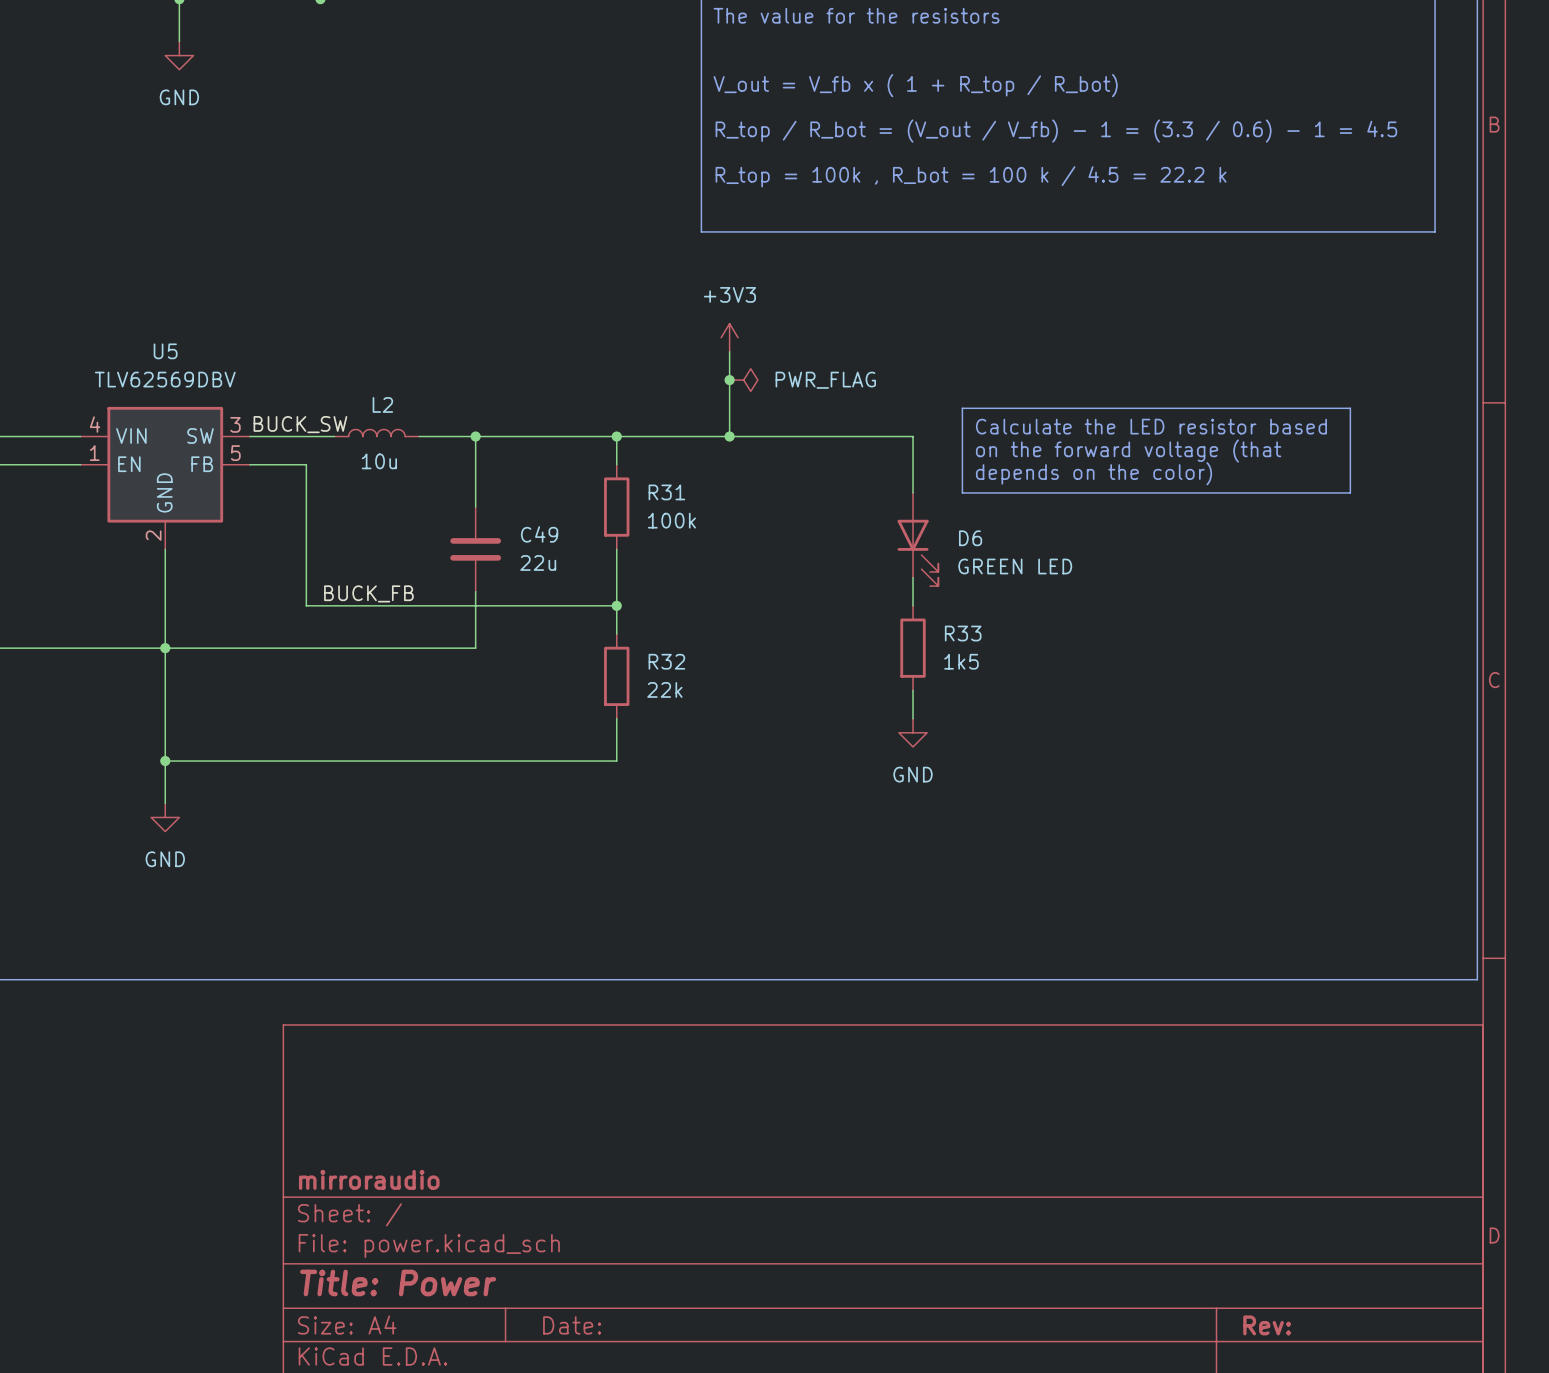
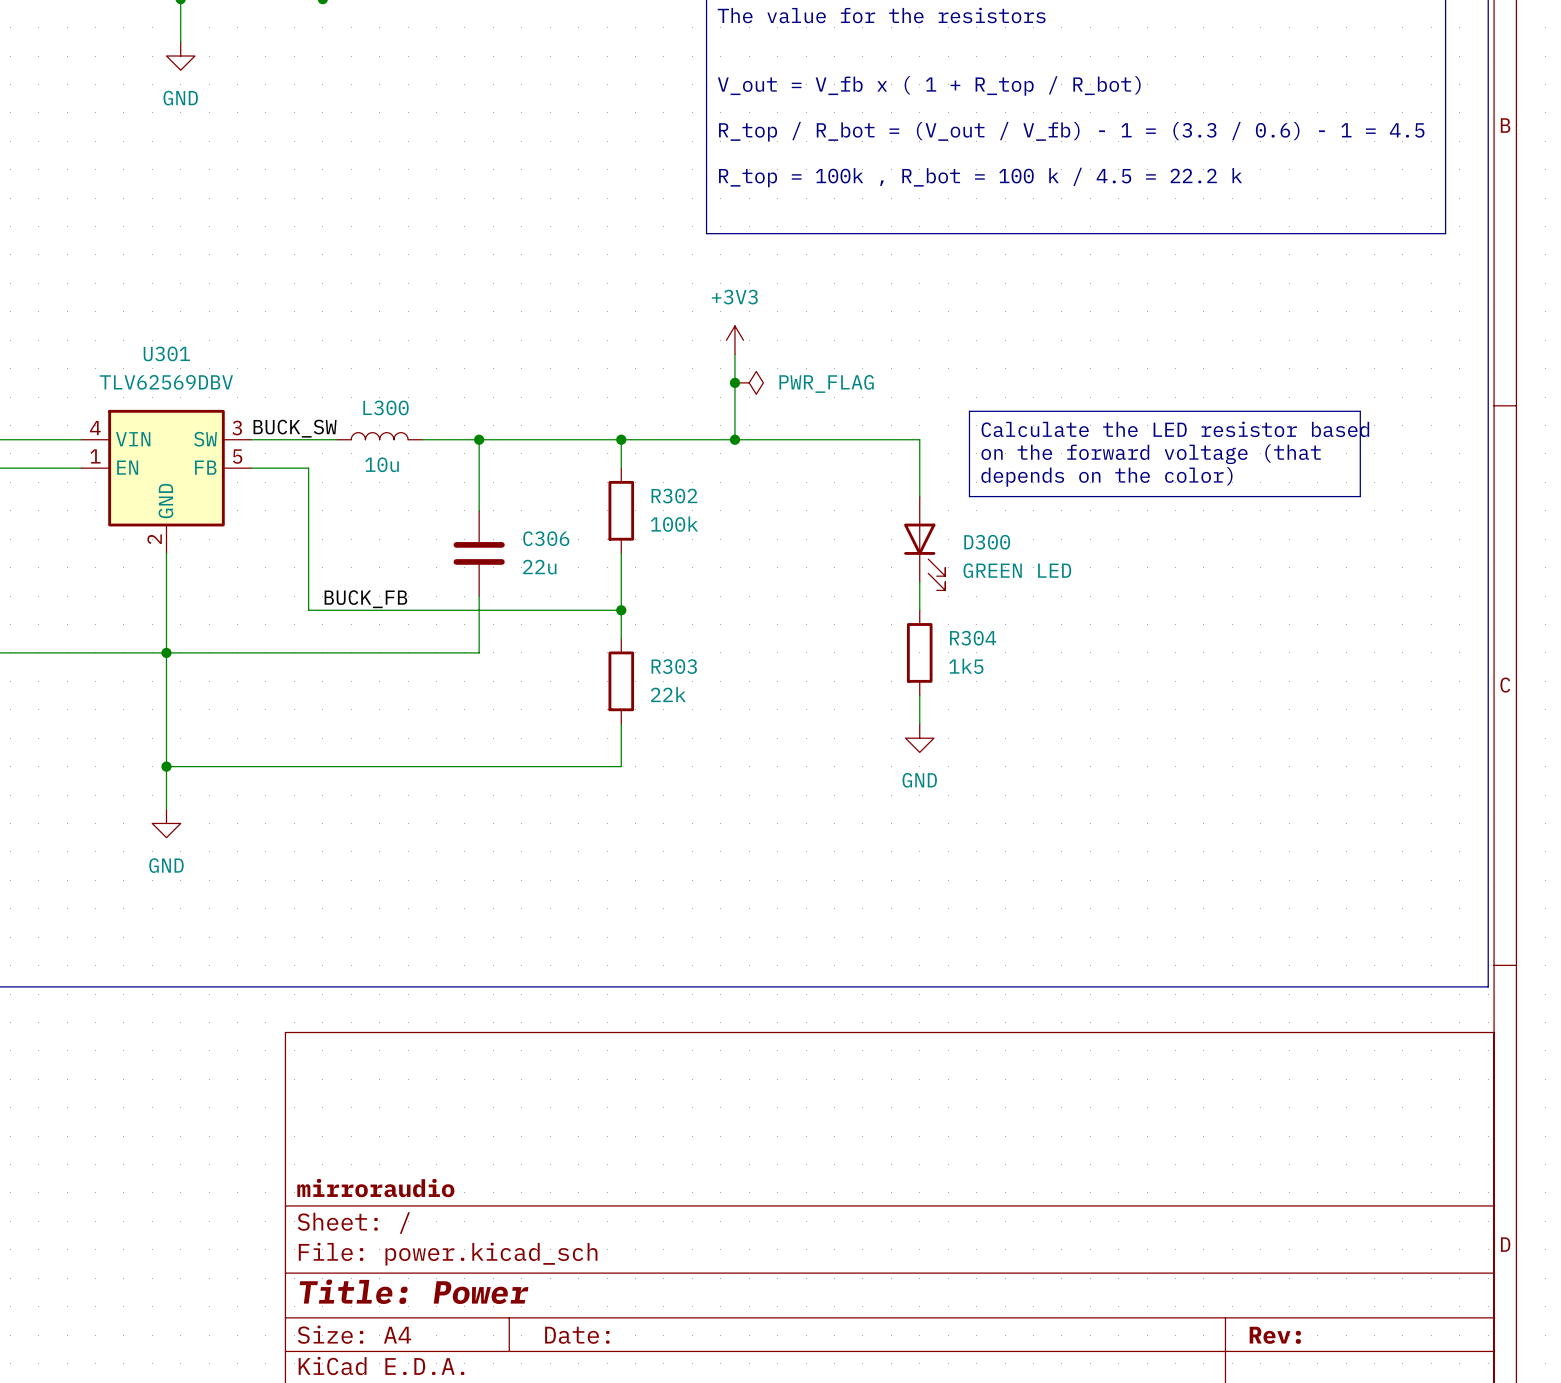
U5 name: U5 (165, 351) -> U301 (166, 353)
L2 name: L2 (382, 404) -> L300 (386, 407)
R31 name: R31 (666, 492) -> R302 (674, 496)
C49 name: C49 (539, 534) -> C306 (546, 538)
D6 name: D6 (970, 538) -> D300 (987, 542)
R33 name: R33 (963, 633) -> R304 (973, 638)
R32 name: R32 (666, 661) -> R303 (674, 666)

